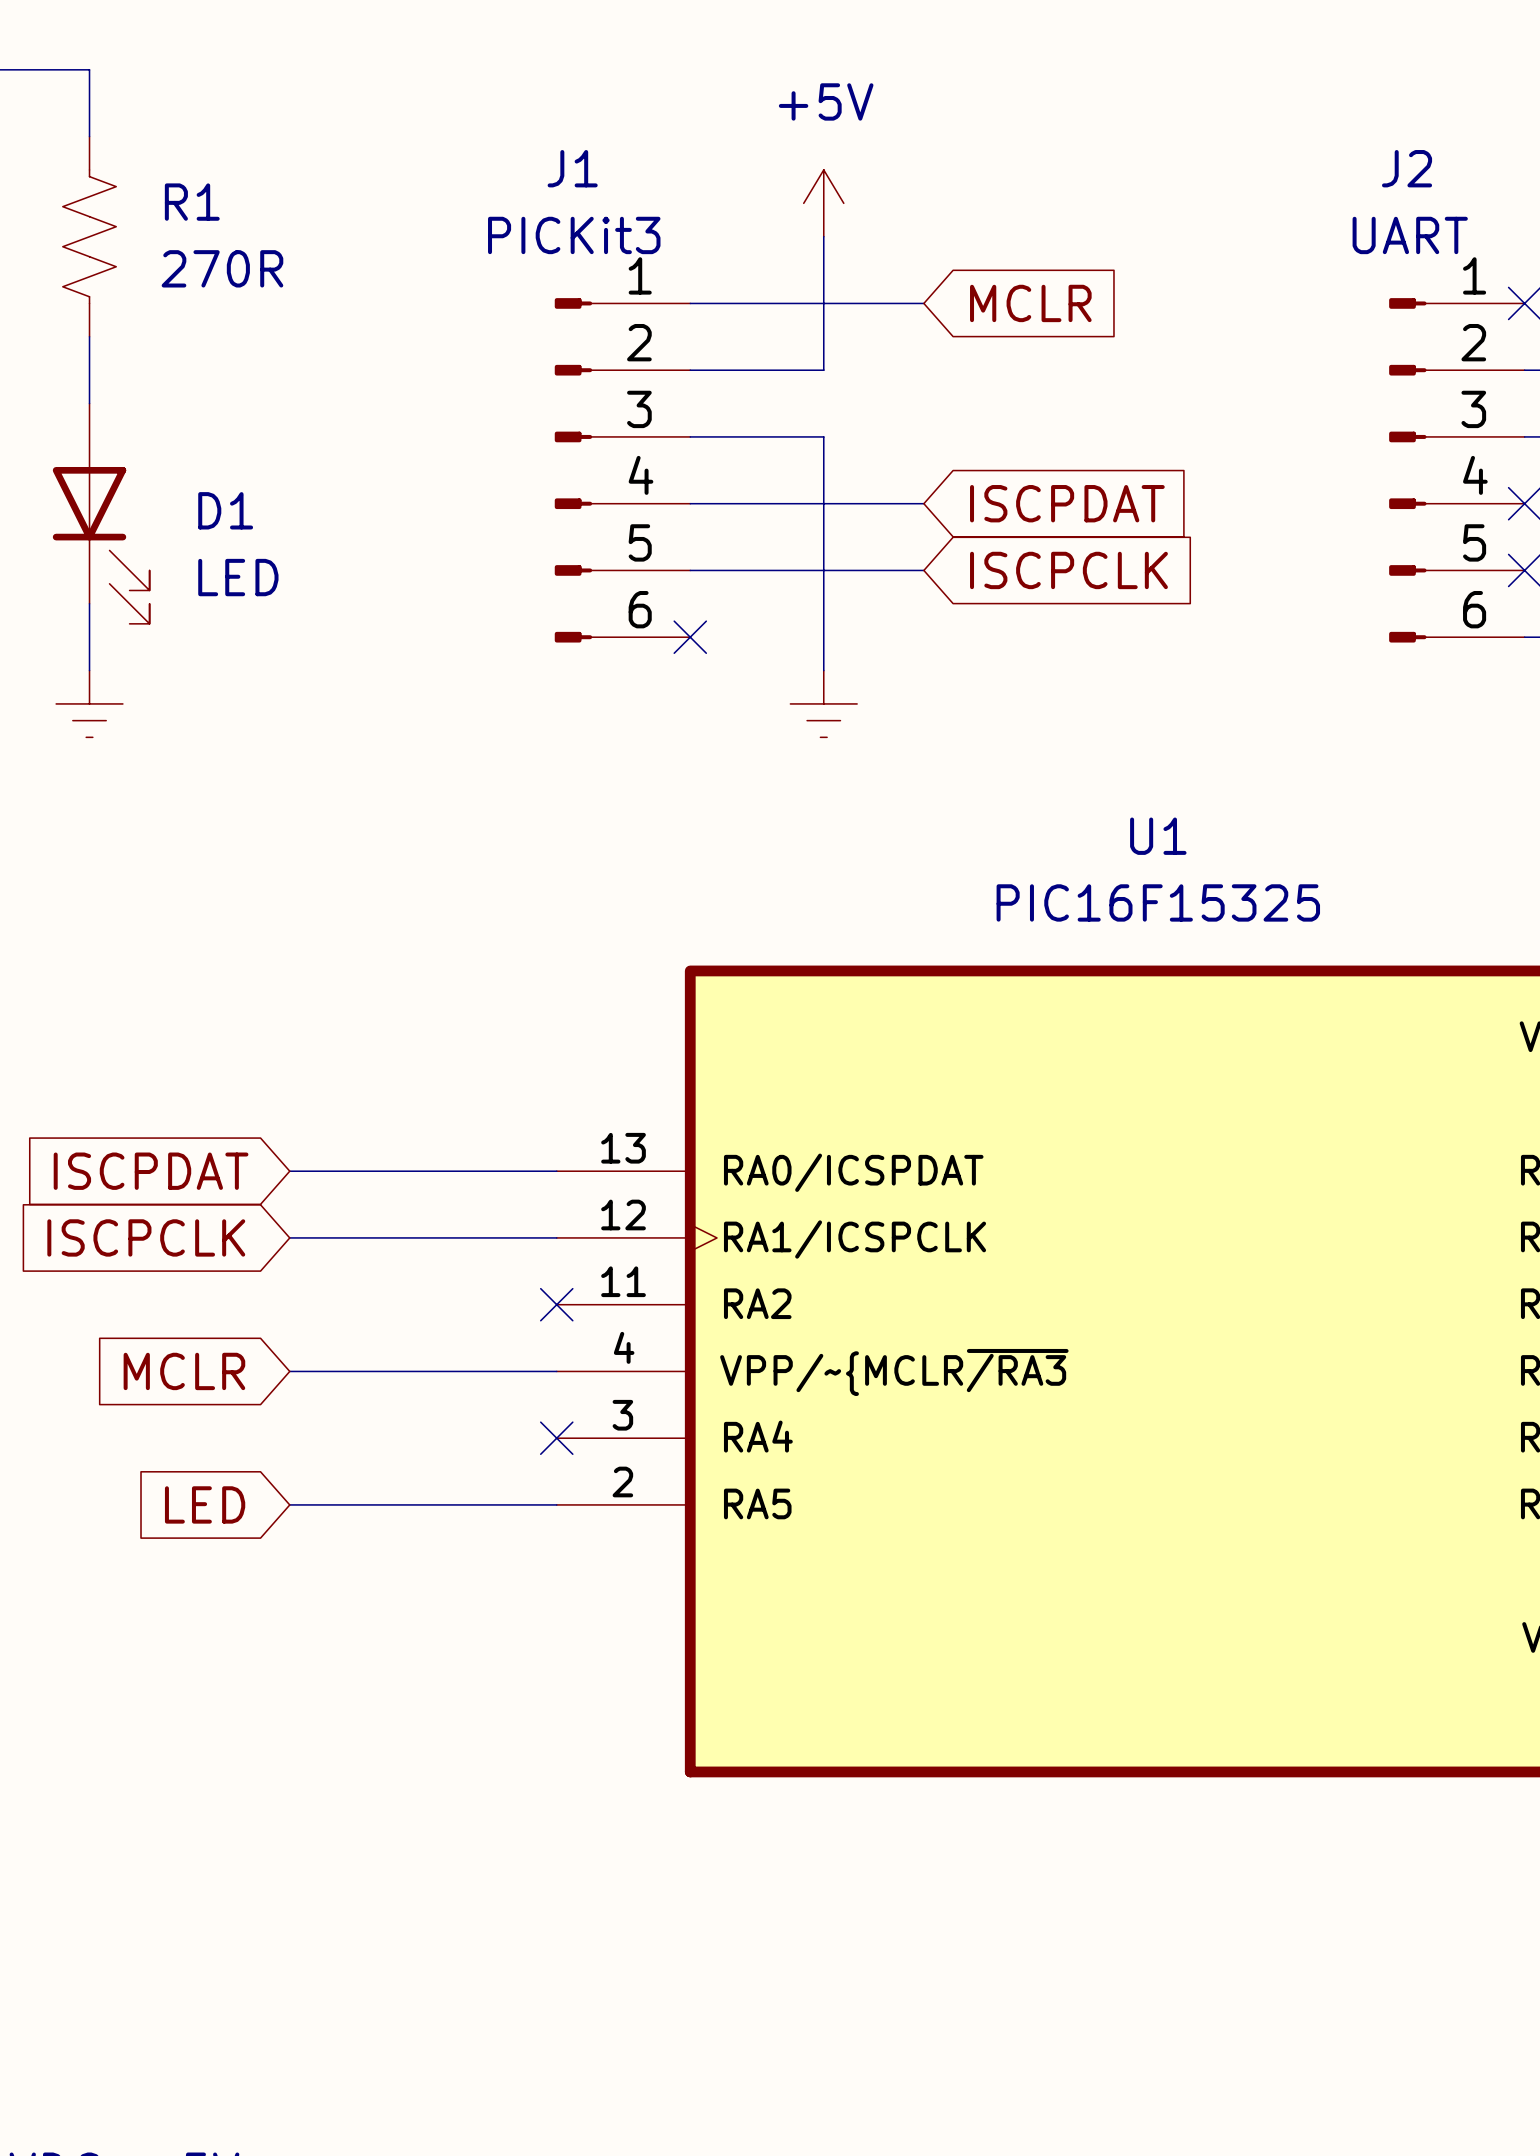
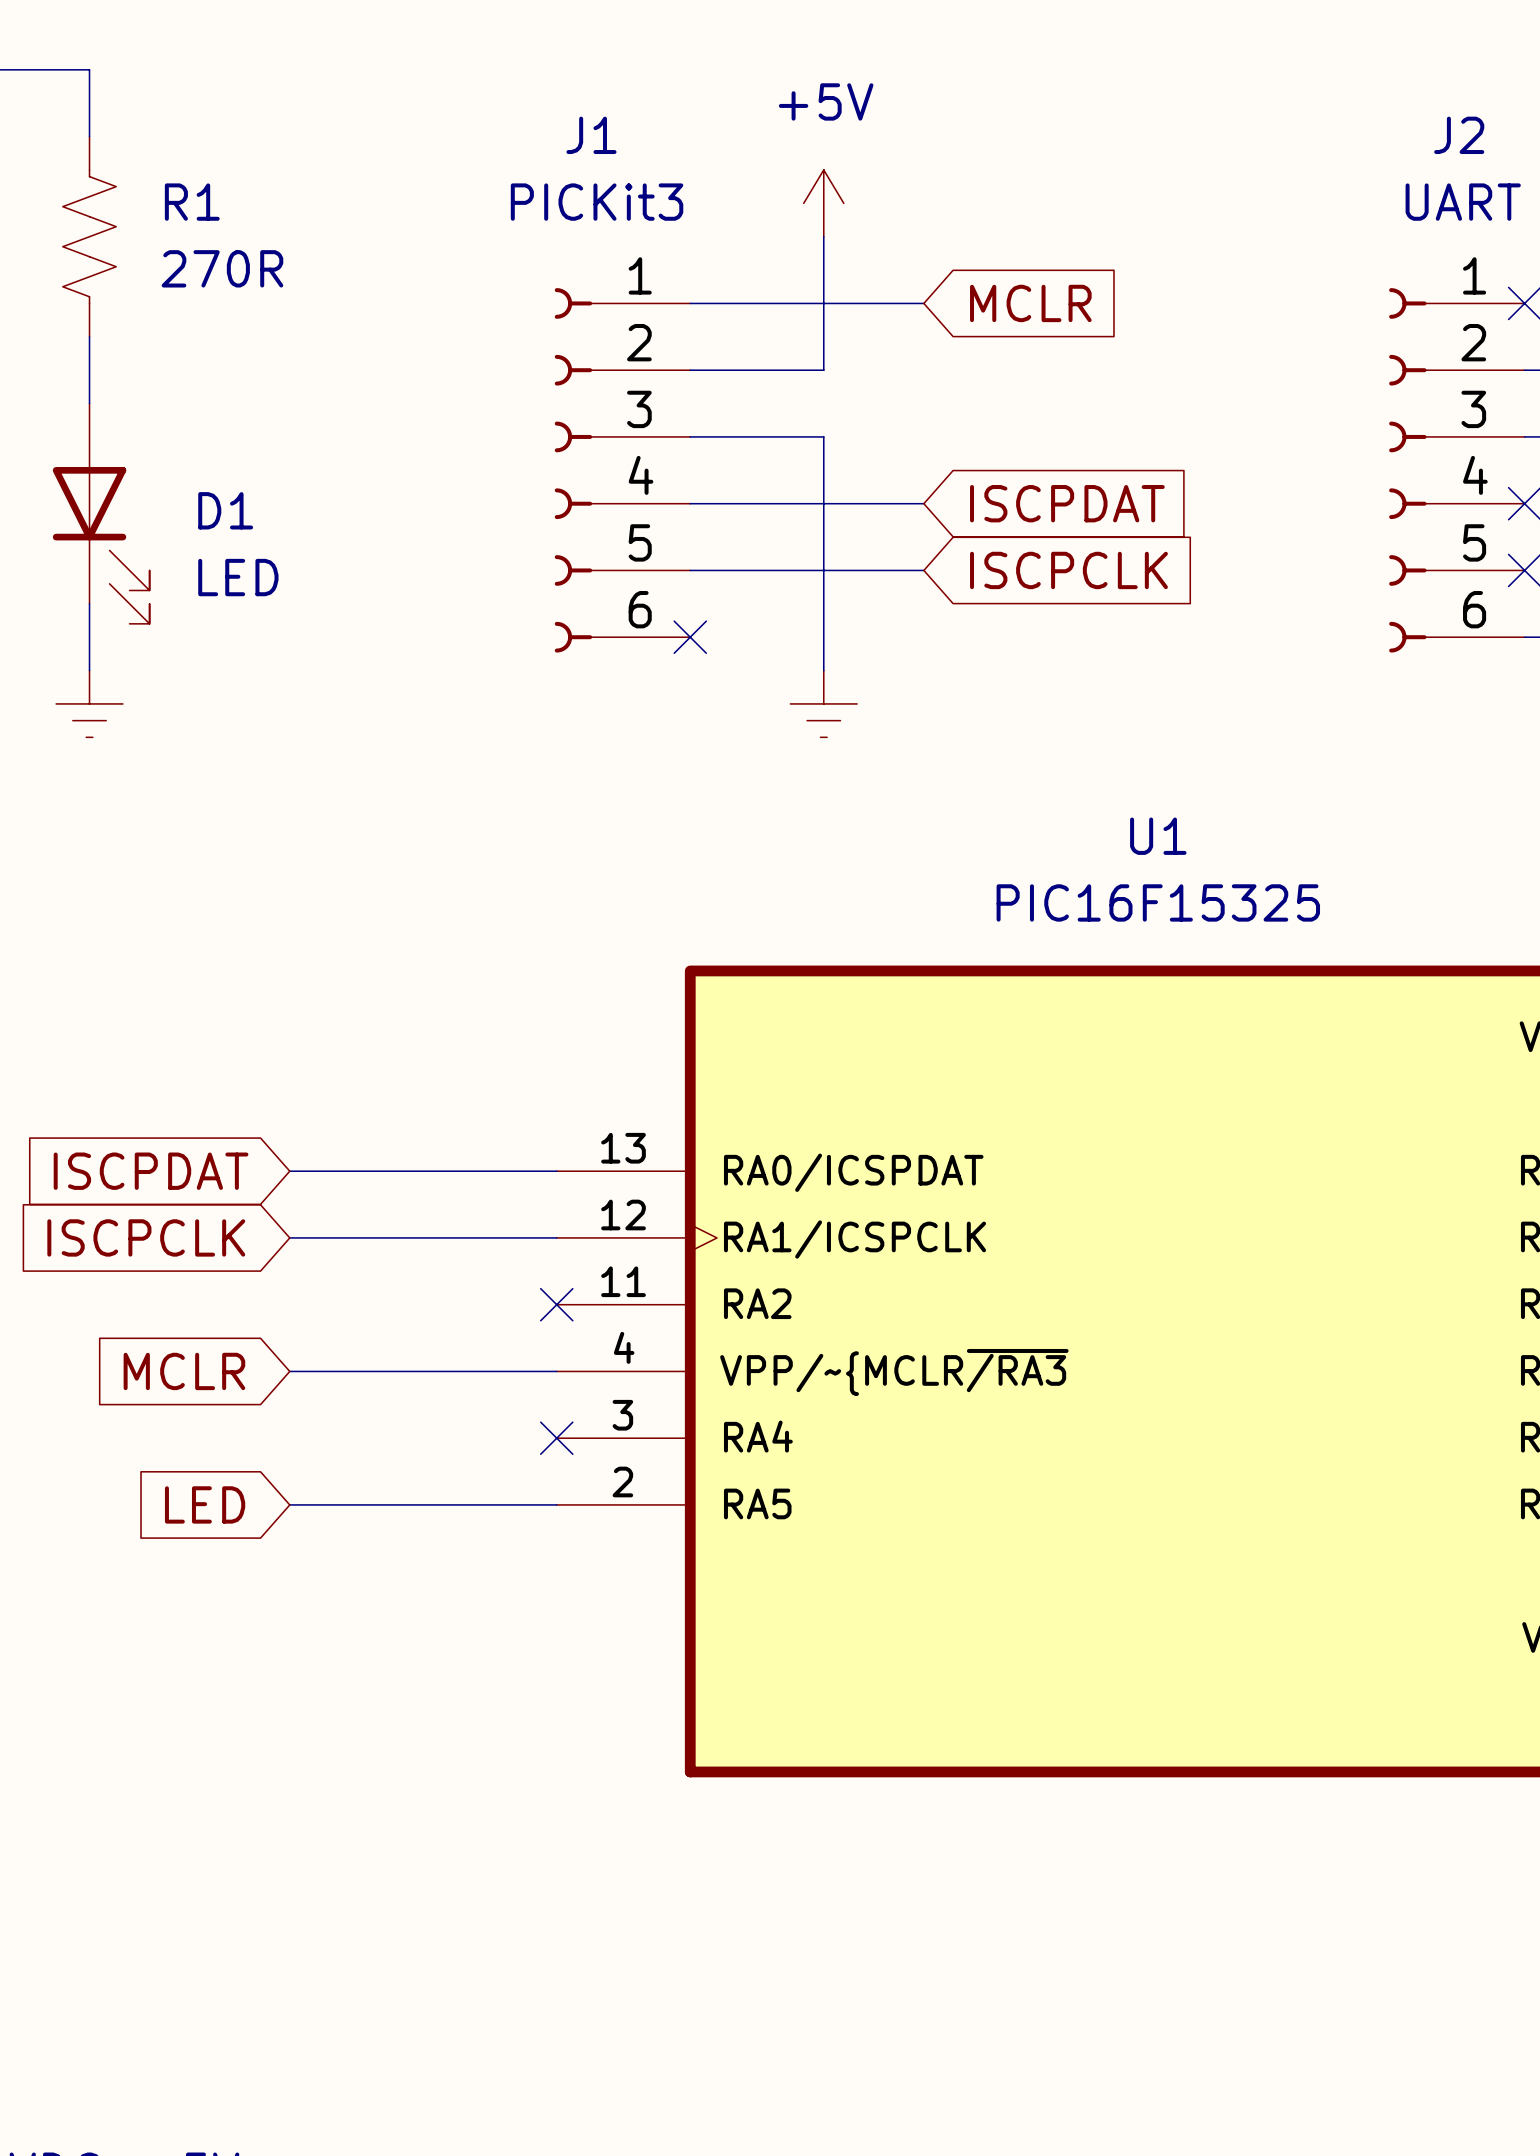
J1 name position: J1 (572, 168) -> J1 (591, 135)
J2 name position: J2 (1407, 168) -> J2 (1459, 135)
J1 value position: PICKit3 (574, 235) -> PICKit3 (597, 202)
J2 value position: UART (1410, 235) -> UART (1463, 202)
J1 symbol: [554, 298, 691, 643] -> [554, 288, 691, 653]
J2 symbol: [1389, 298, 1525, 643] -> [1389, 288, 1525, 653]

